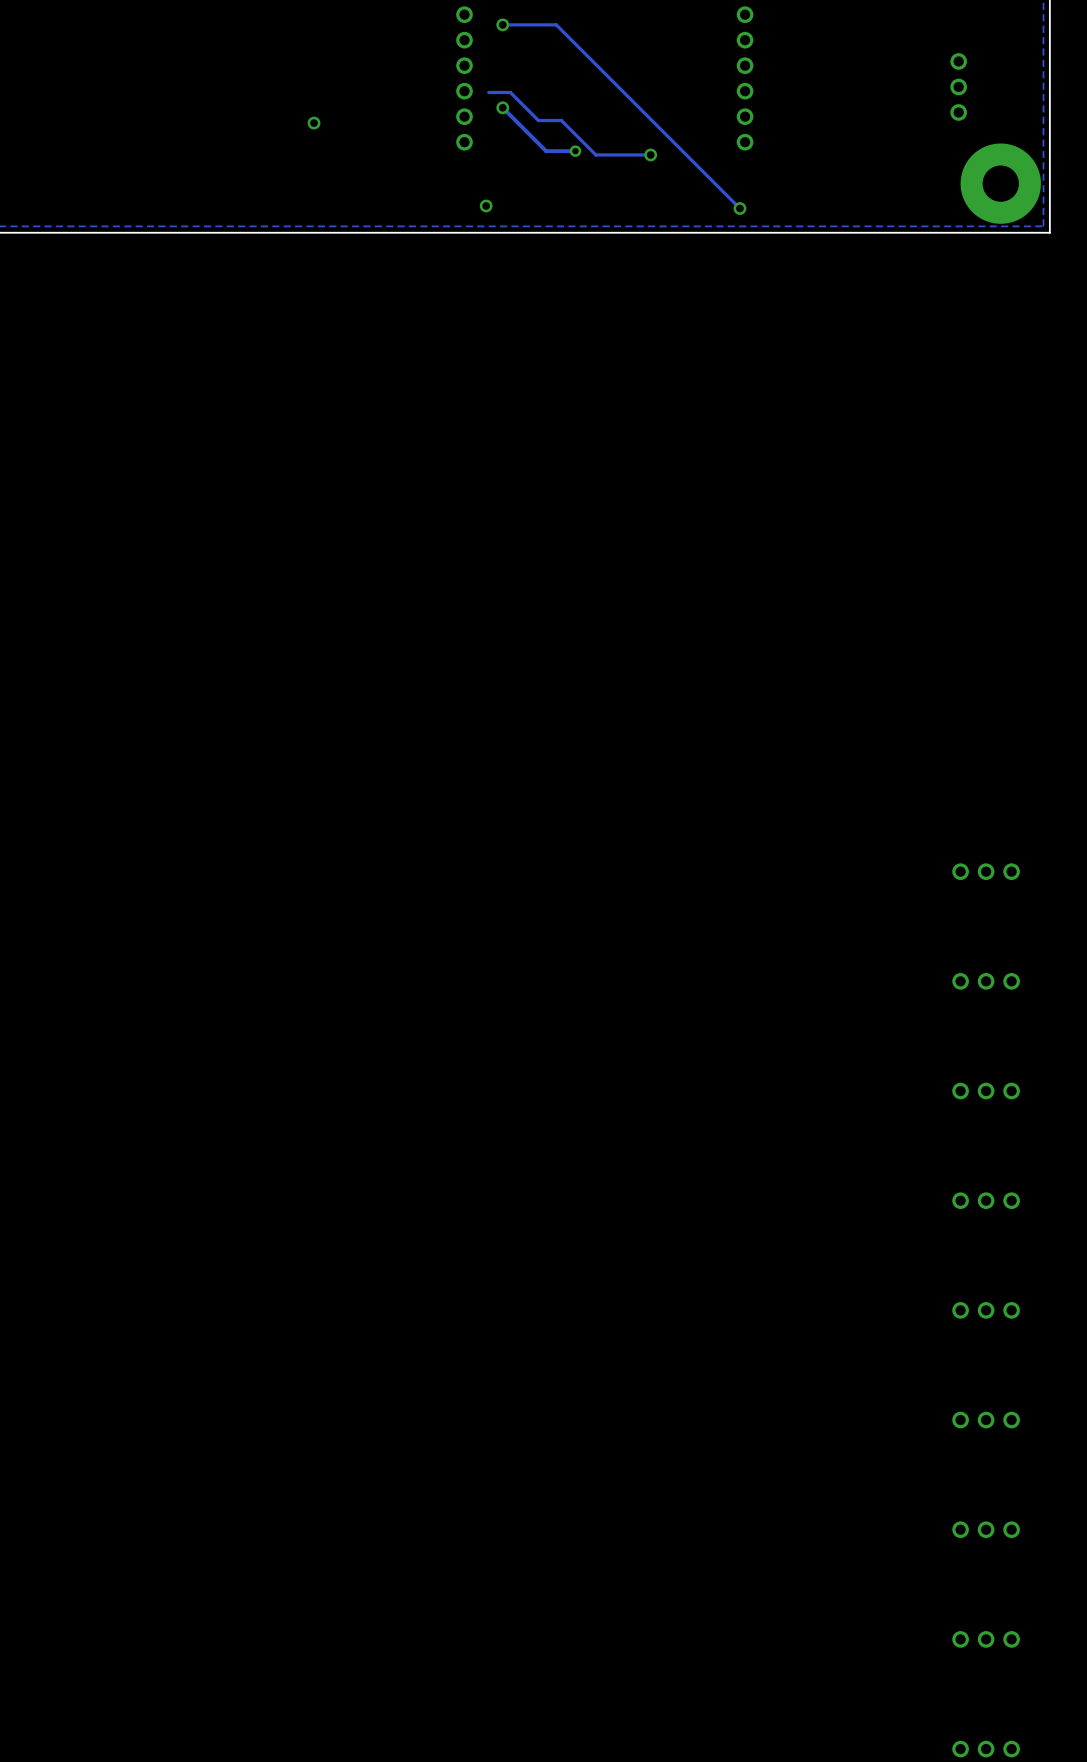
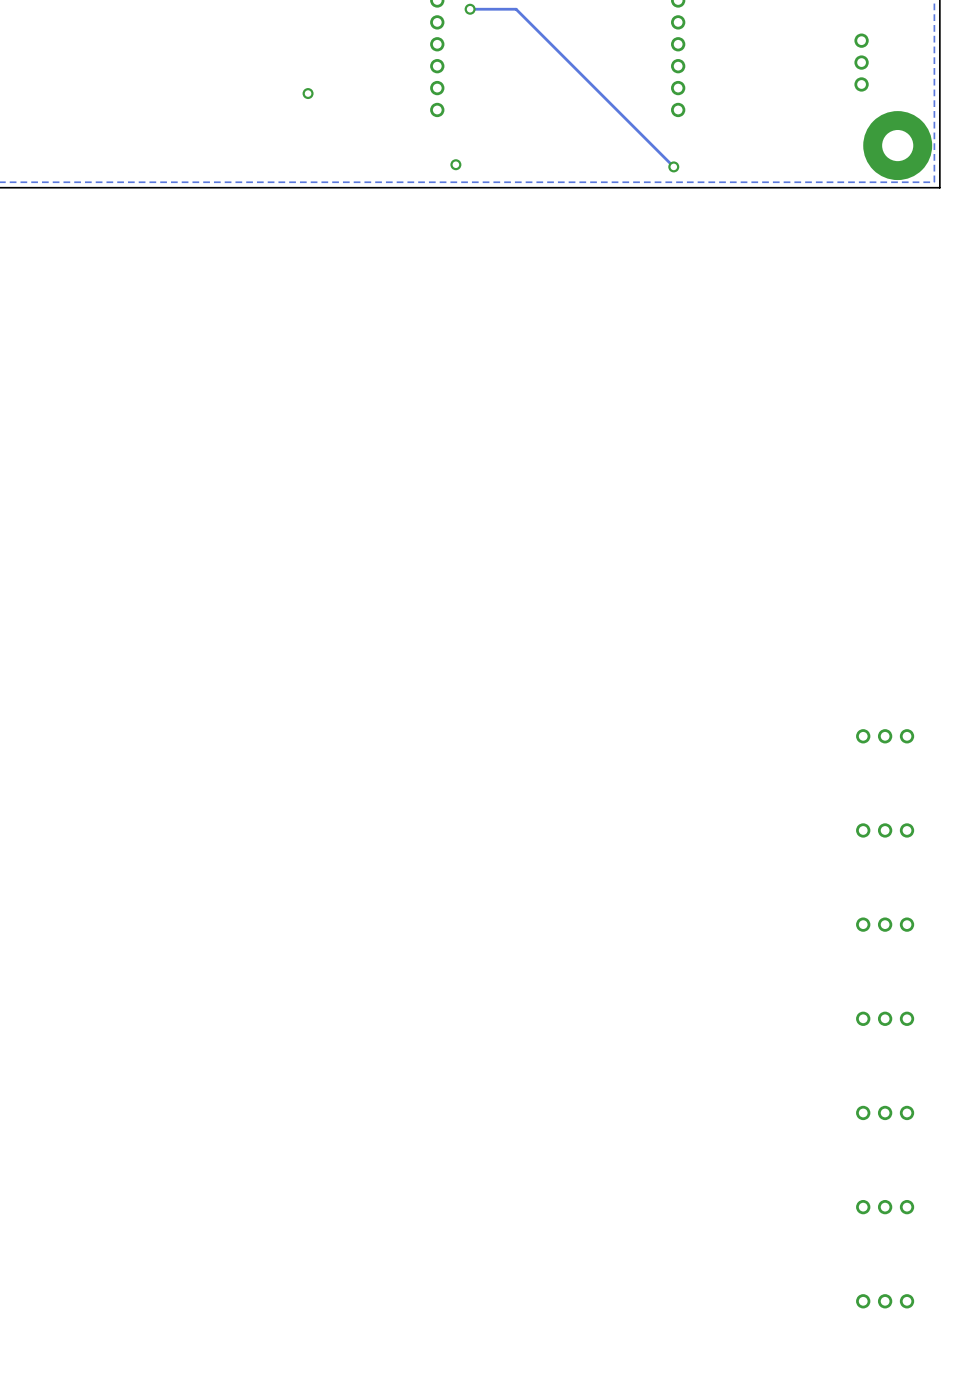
track: (488, 92) (510, 92) (538, 120) (561, 120) (595, 154) (650, 154) -> none
track: (502, 107) (546, 151) (575, 151) -> none
via: (502, 107) -> none
via: (575, 151) -> none
via: (650, 154) -> none

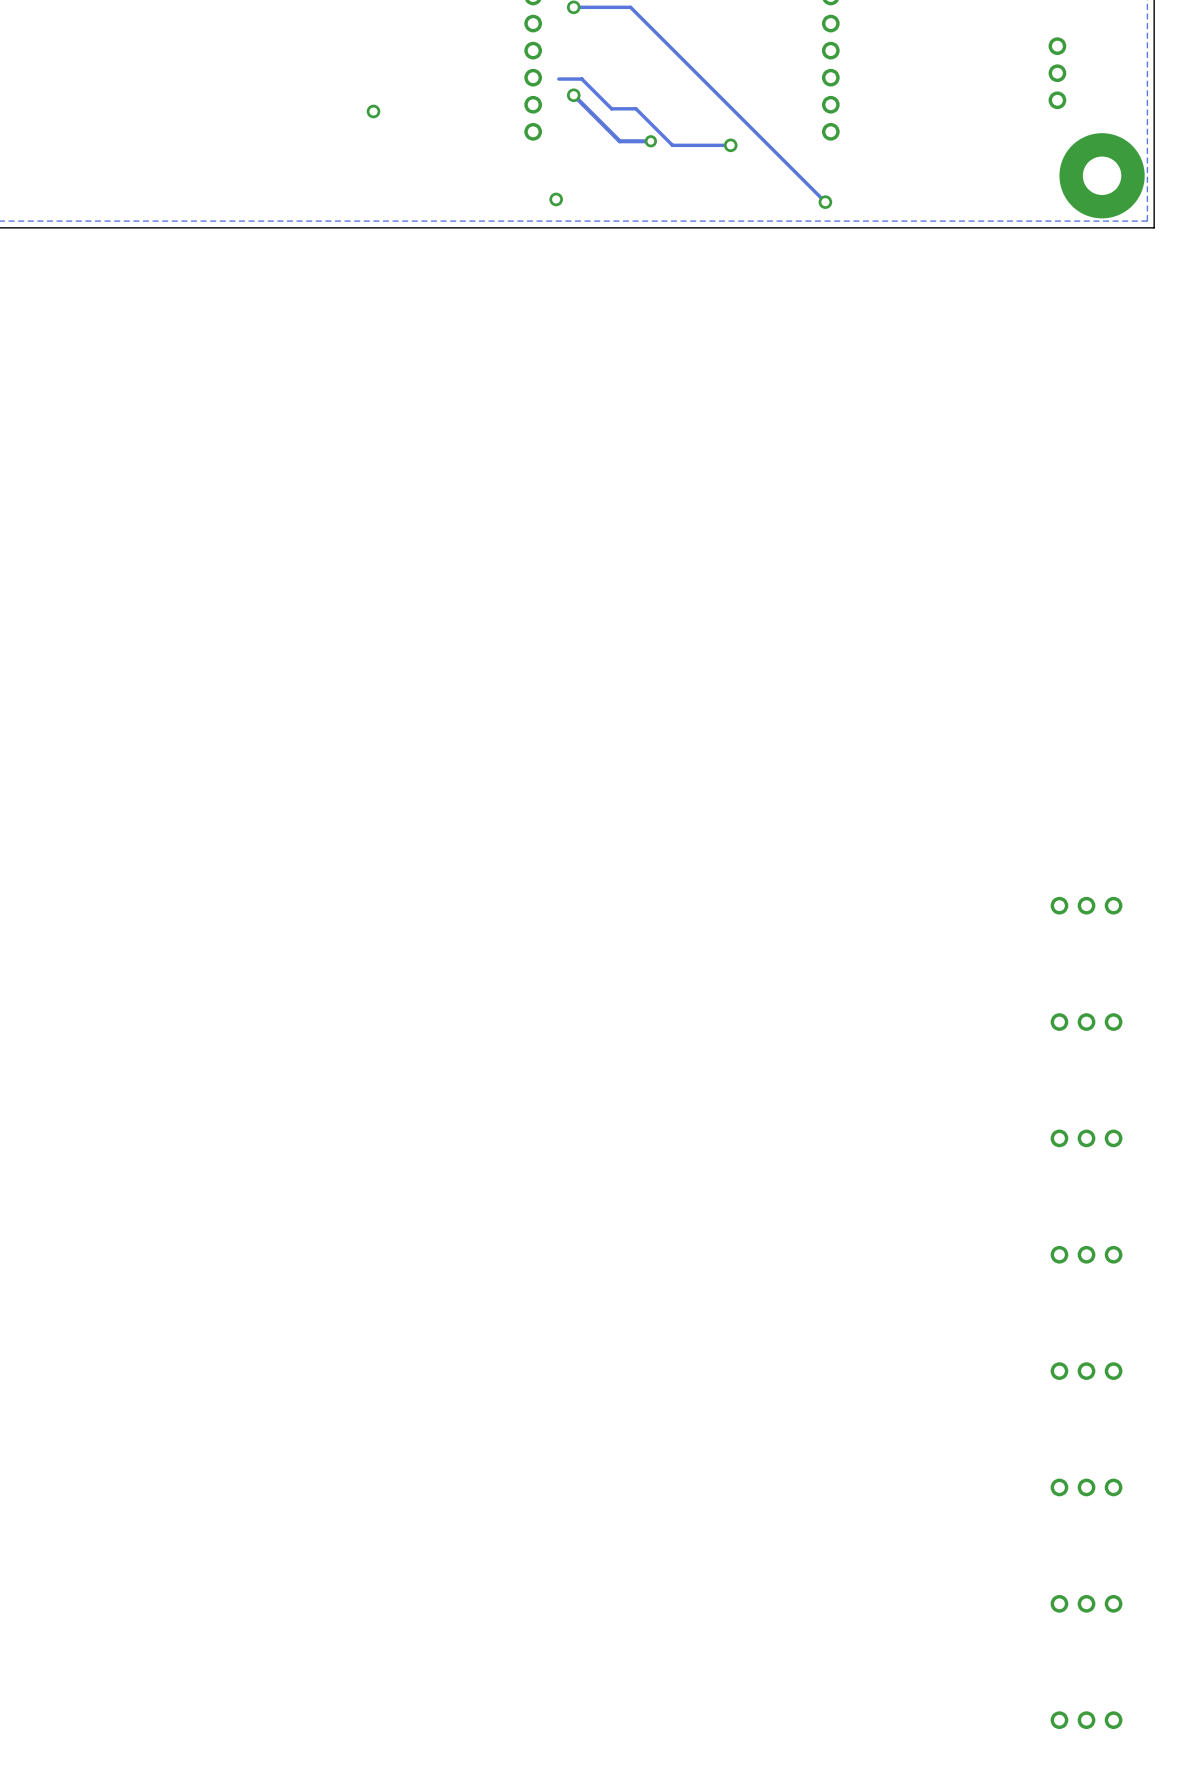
track: none -> (558, 79) (581, 79) (611, 108) (635, 108) (672, 145) (730, 145)
track: none -> (573, 95) (619, 141) (650, 141)
via: none -> (573, 95)
via: none -> (650, 141)
via: none -> (730, 145)

